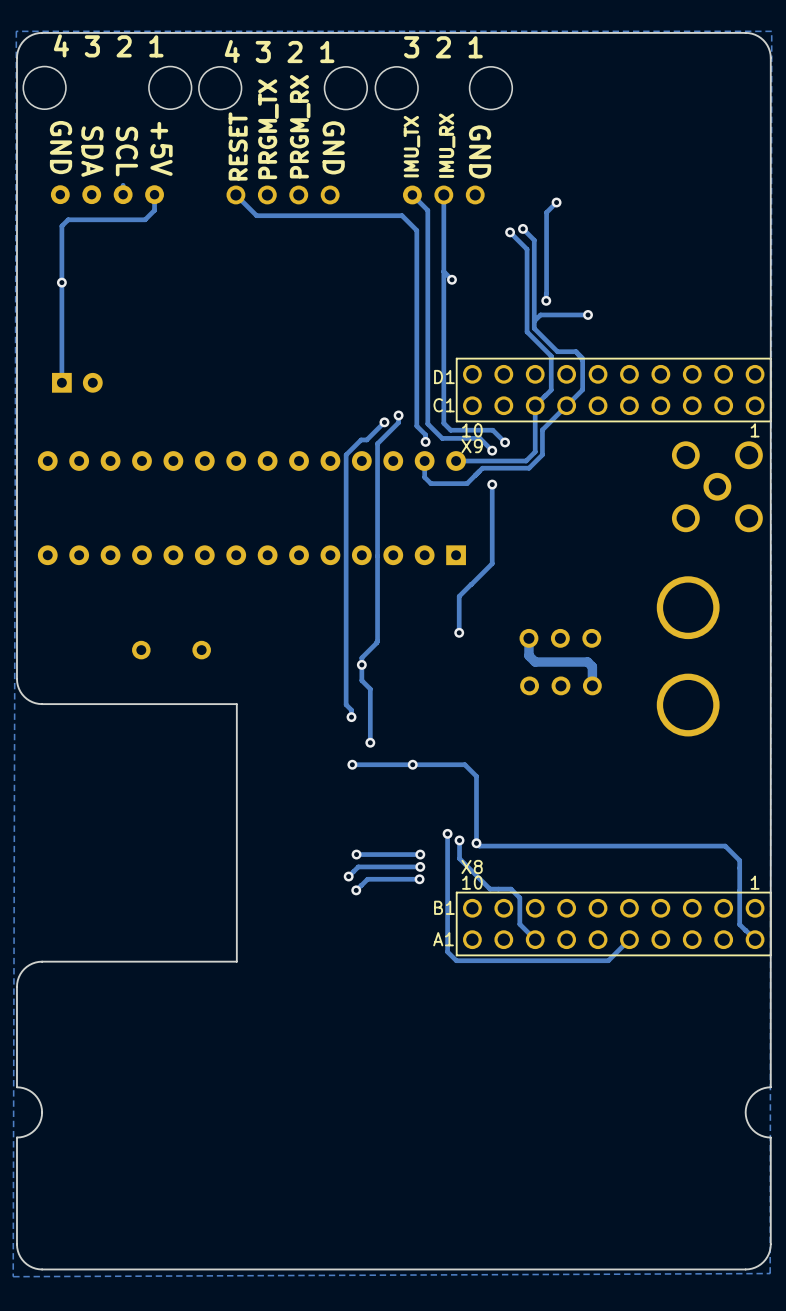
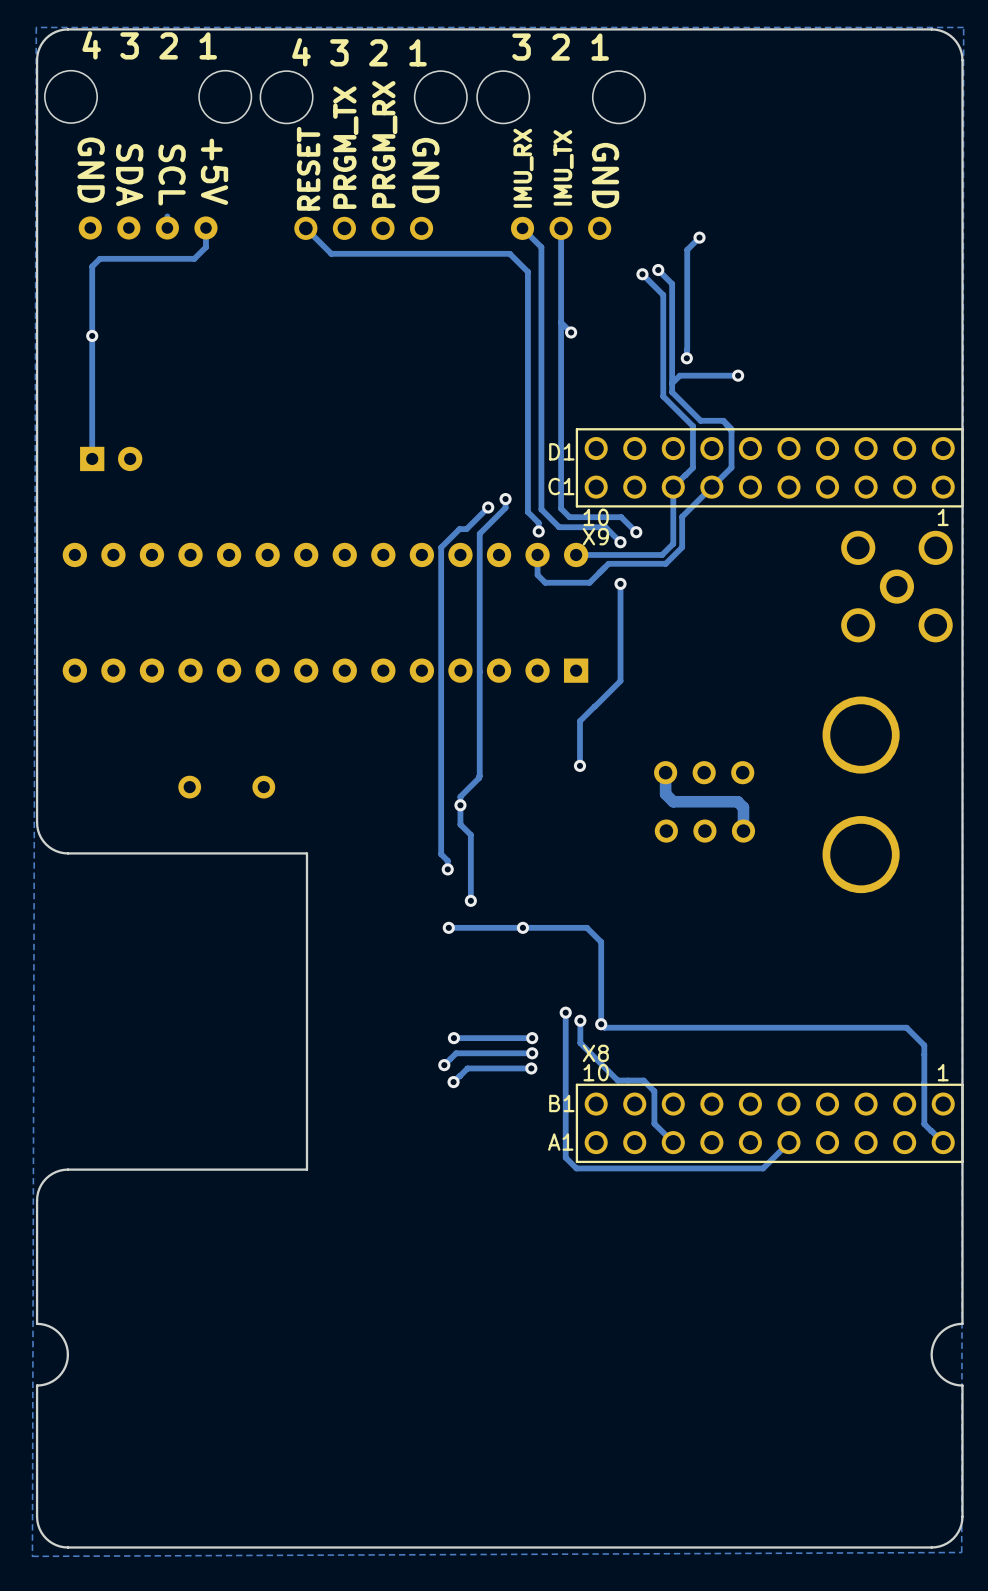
text position: IMU_RX (447, 145) -> IMU_RX (523, 168)
text position: IMU_TX (411, 146) -> IMU_TX (563, 167)

